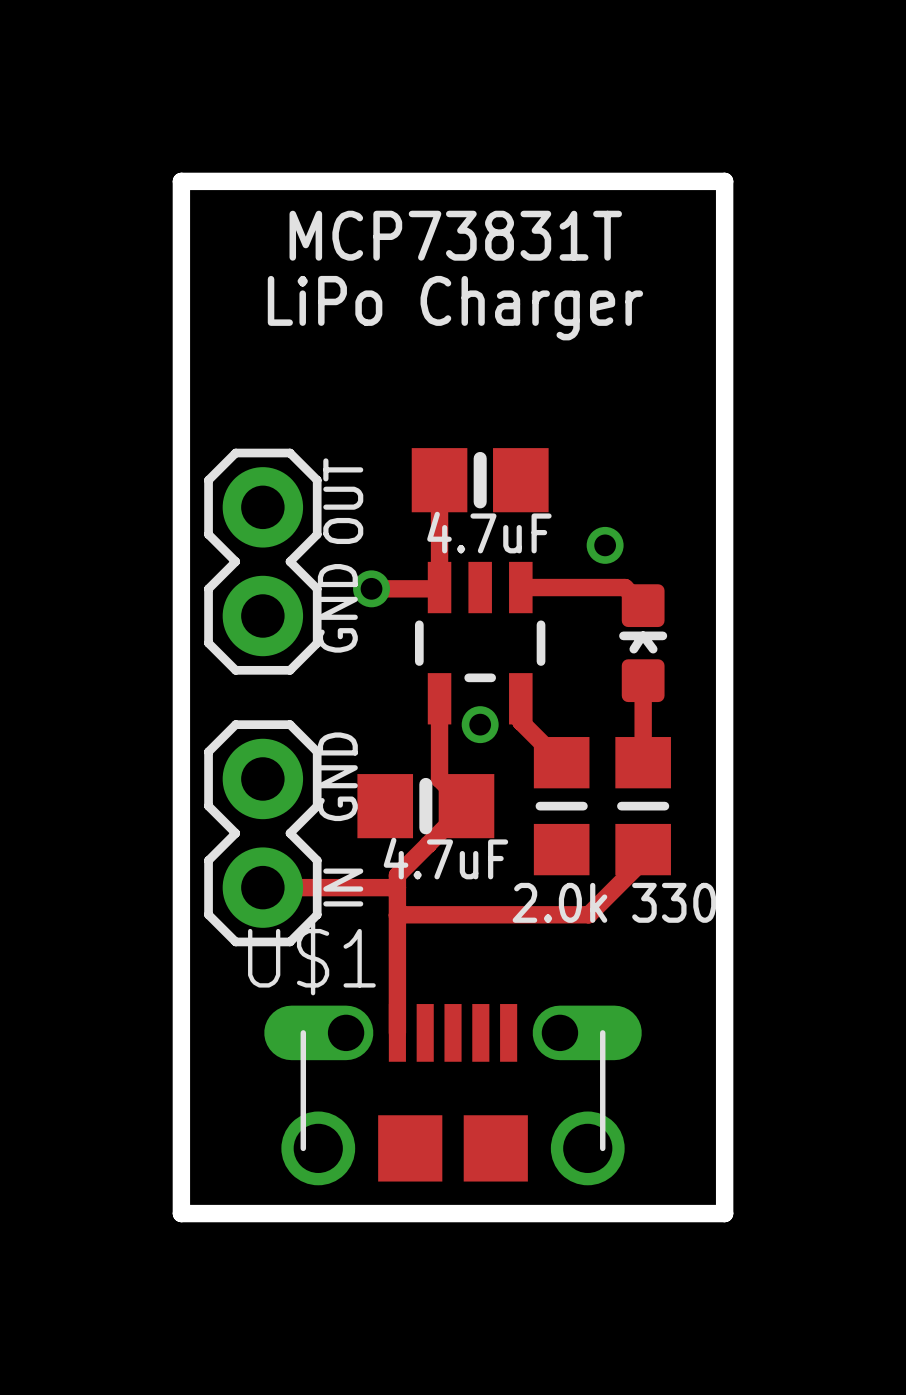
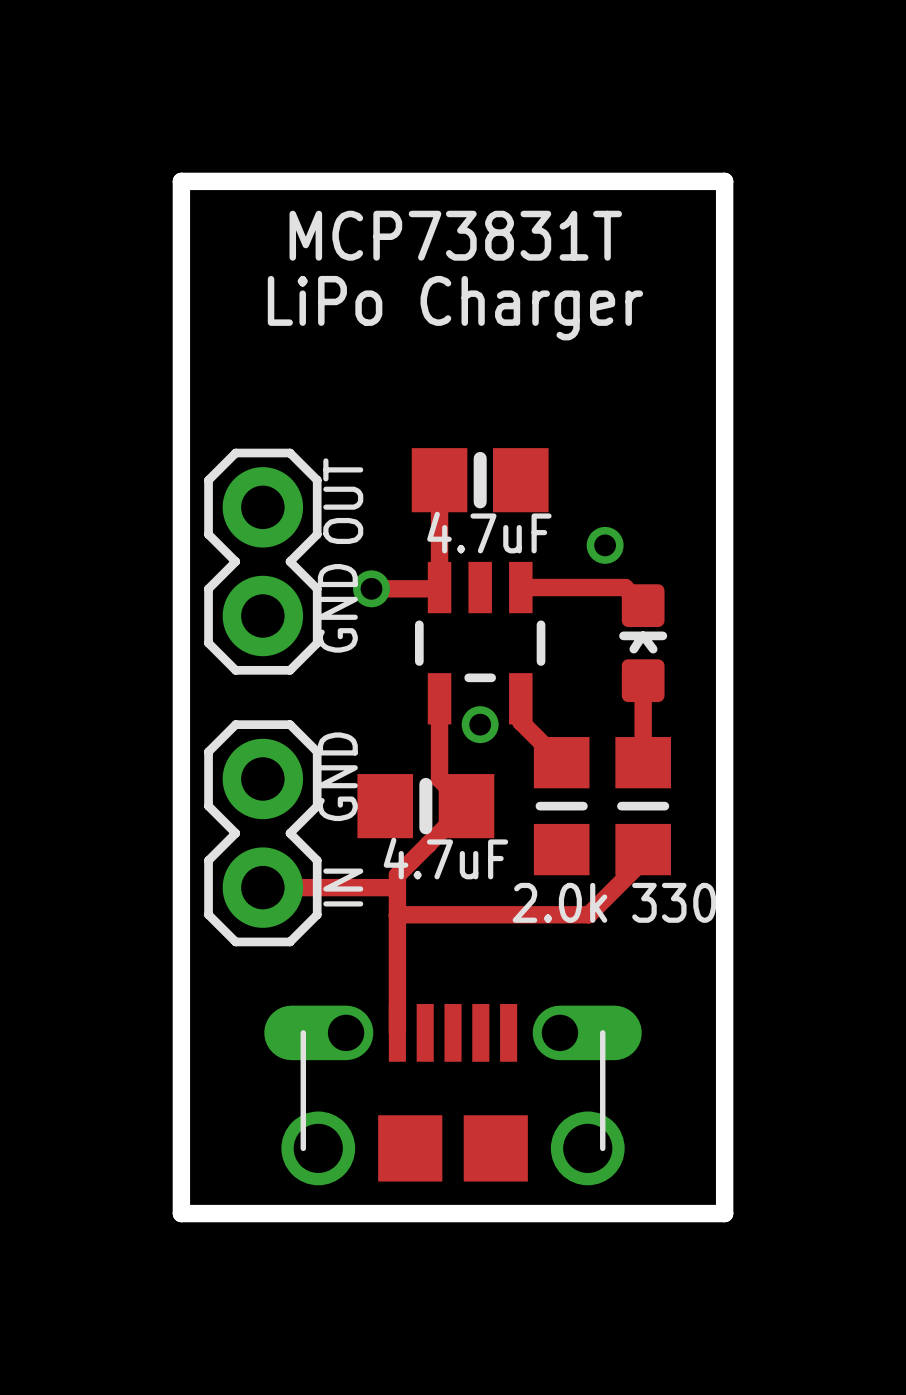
U$1 name: U$1 (311, 958) -> none

